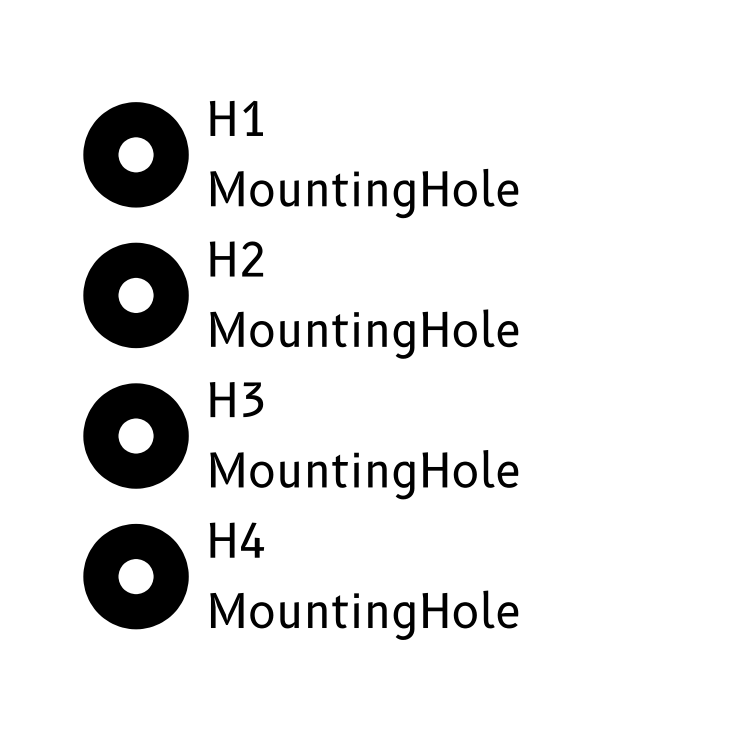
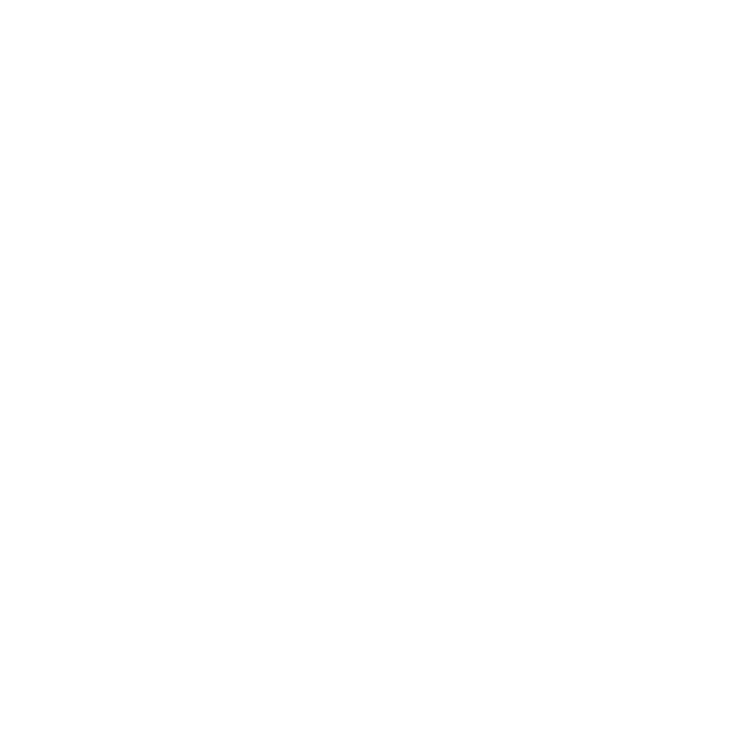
H1: MountingHole (136, 154) -> none
H2: MountingHole (136, 295) -> none
H3: MountingHole (136, 436) -> none
H4: MountingHole (136, 576) -> none

